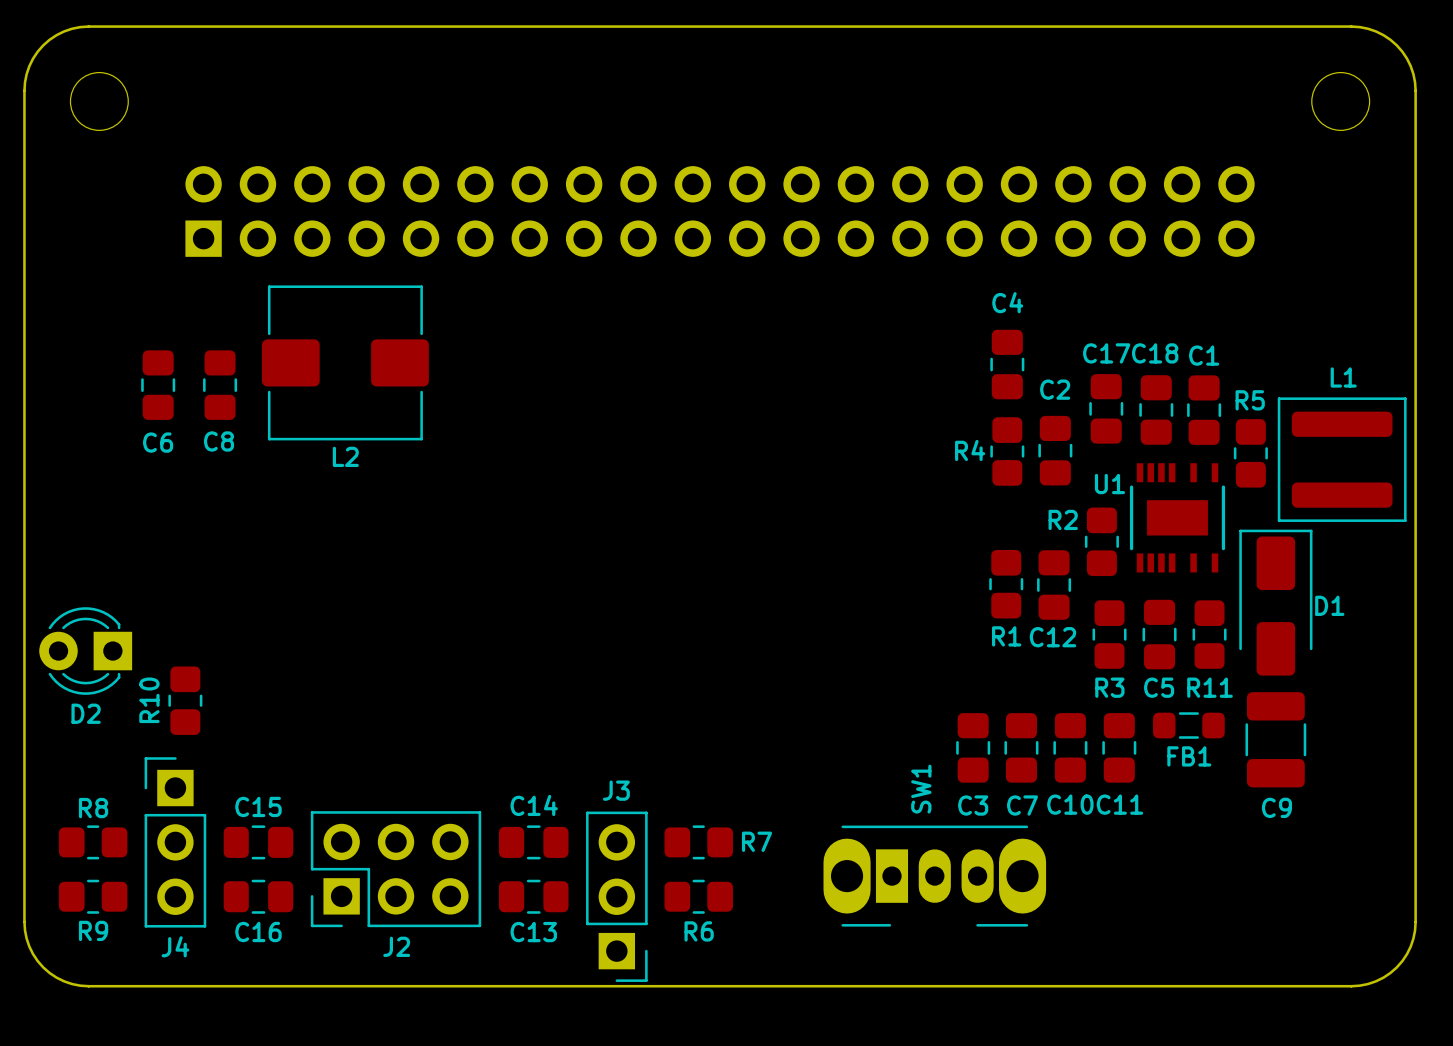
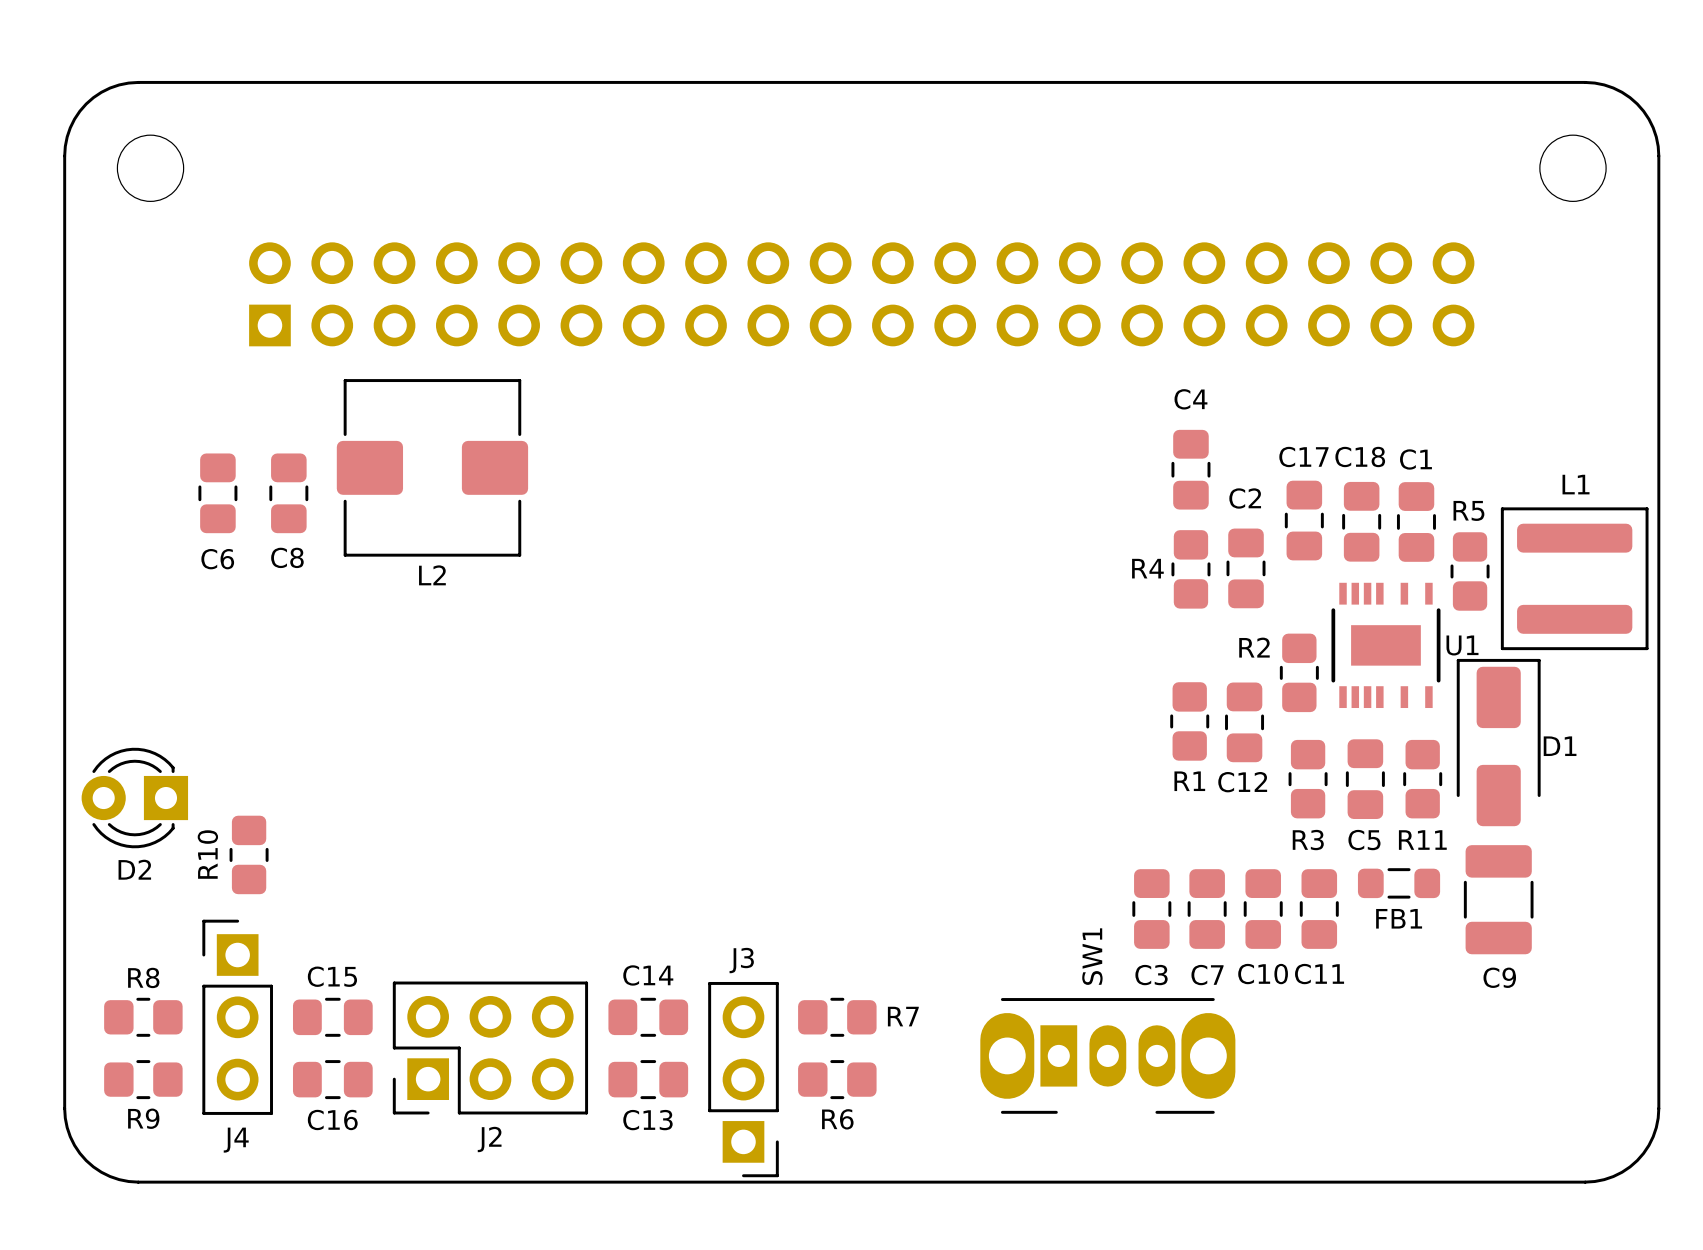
U1 name position: U1 (1109, 484) -> U1 (1462, 645)

